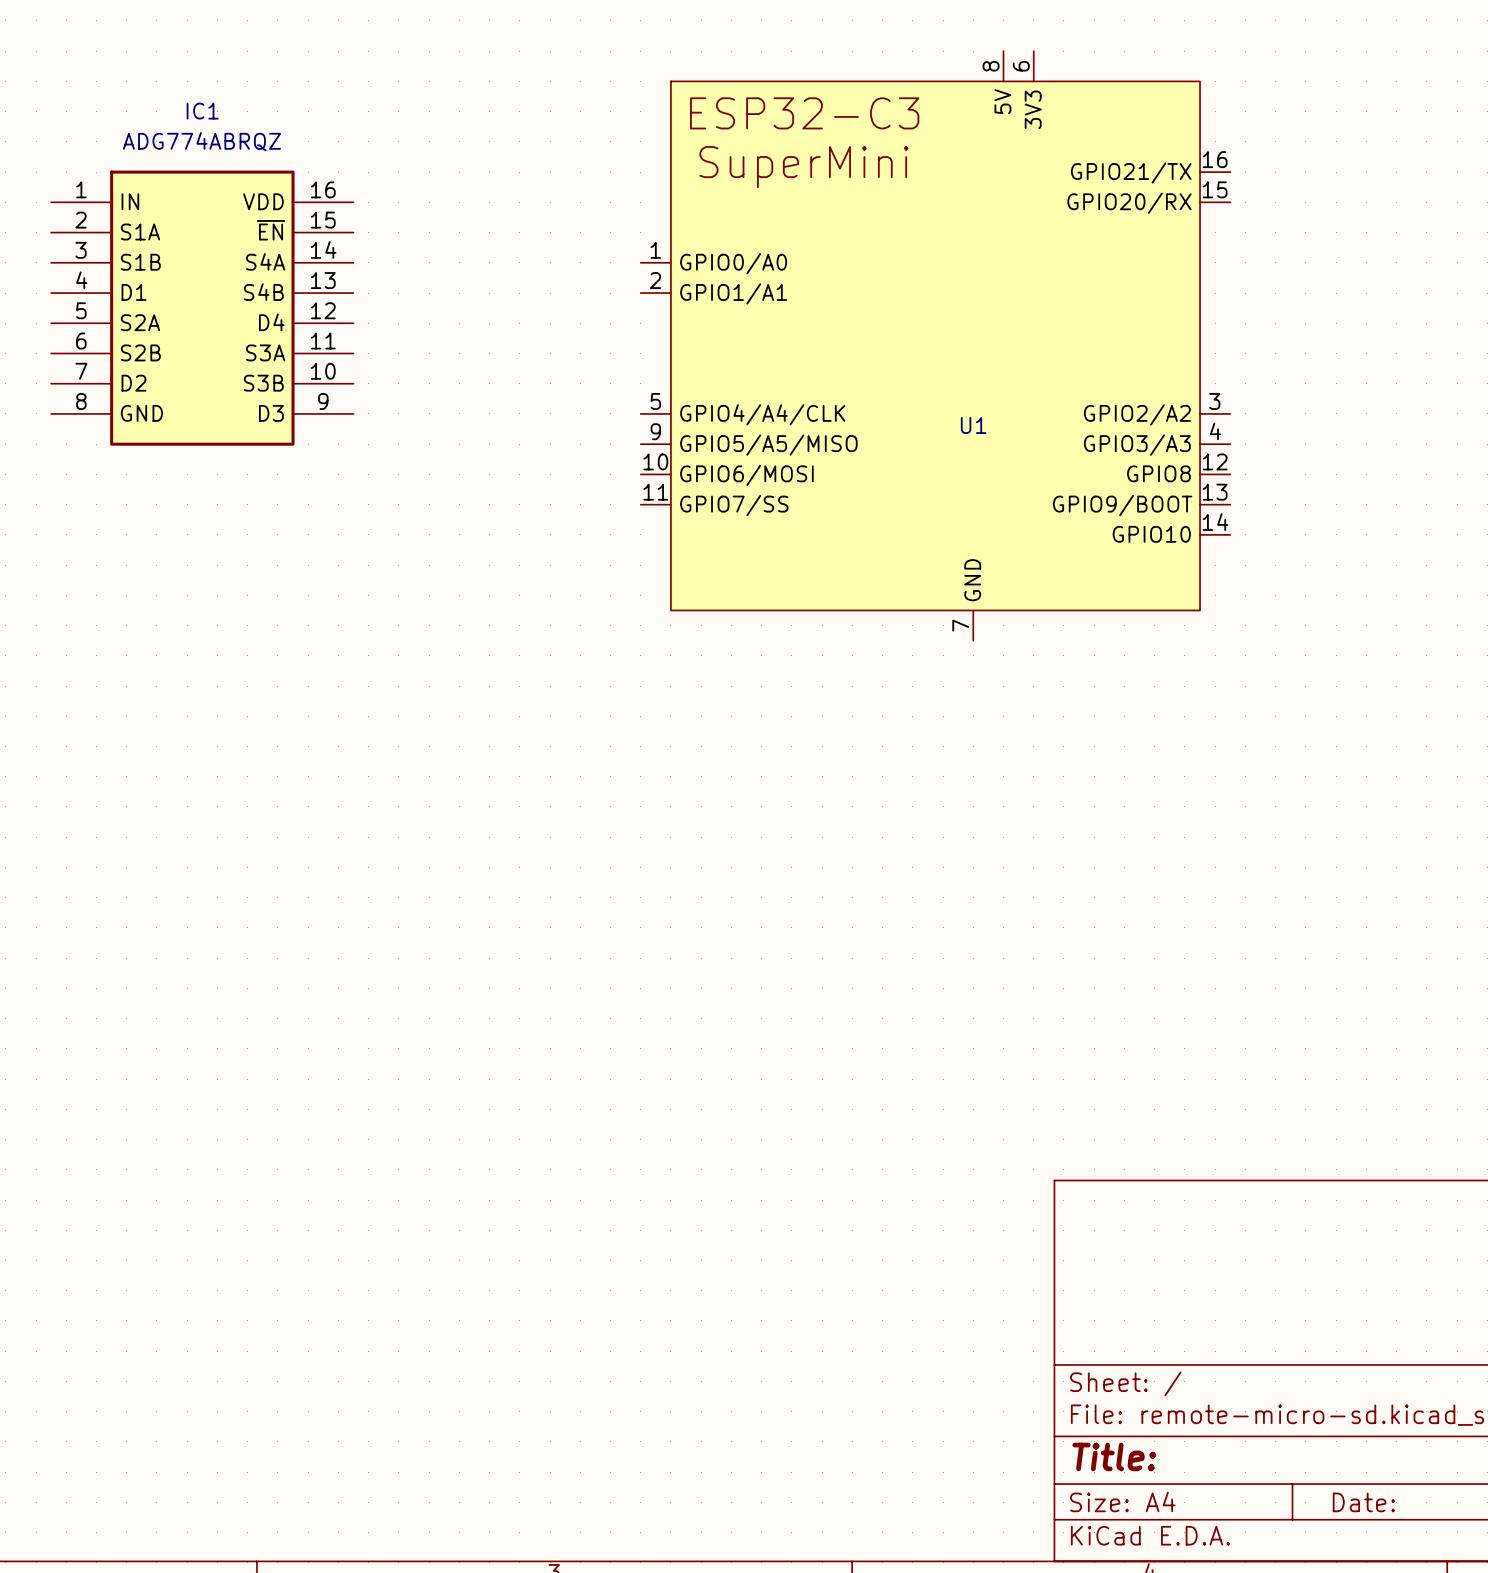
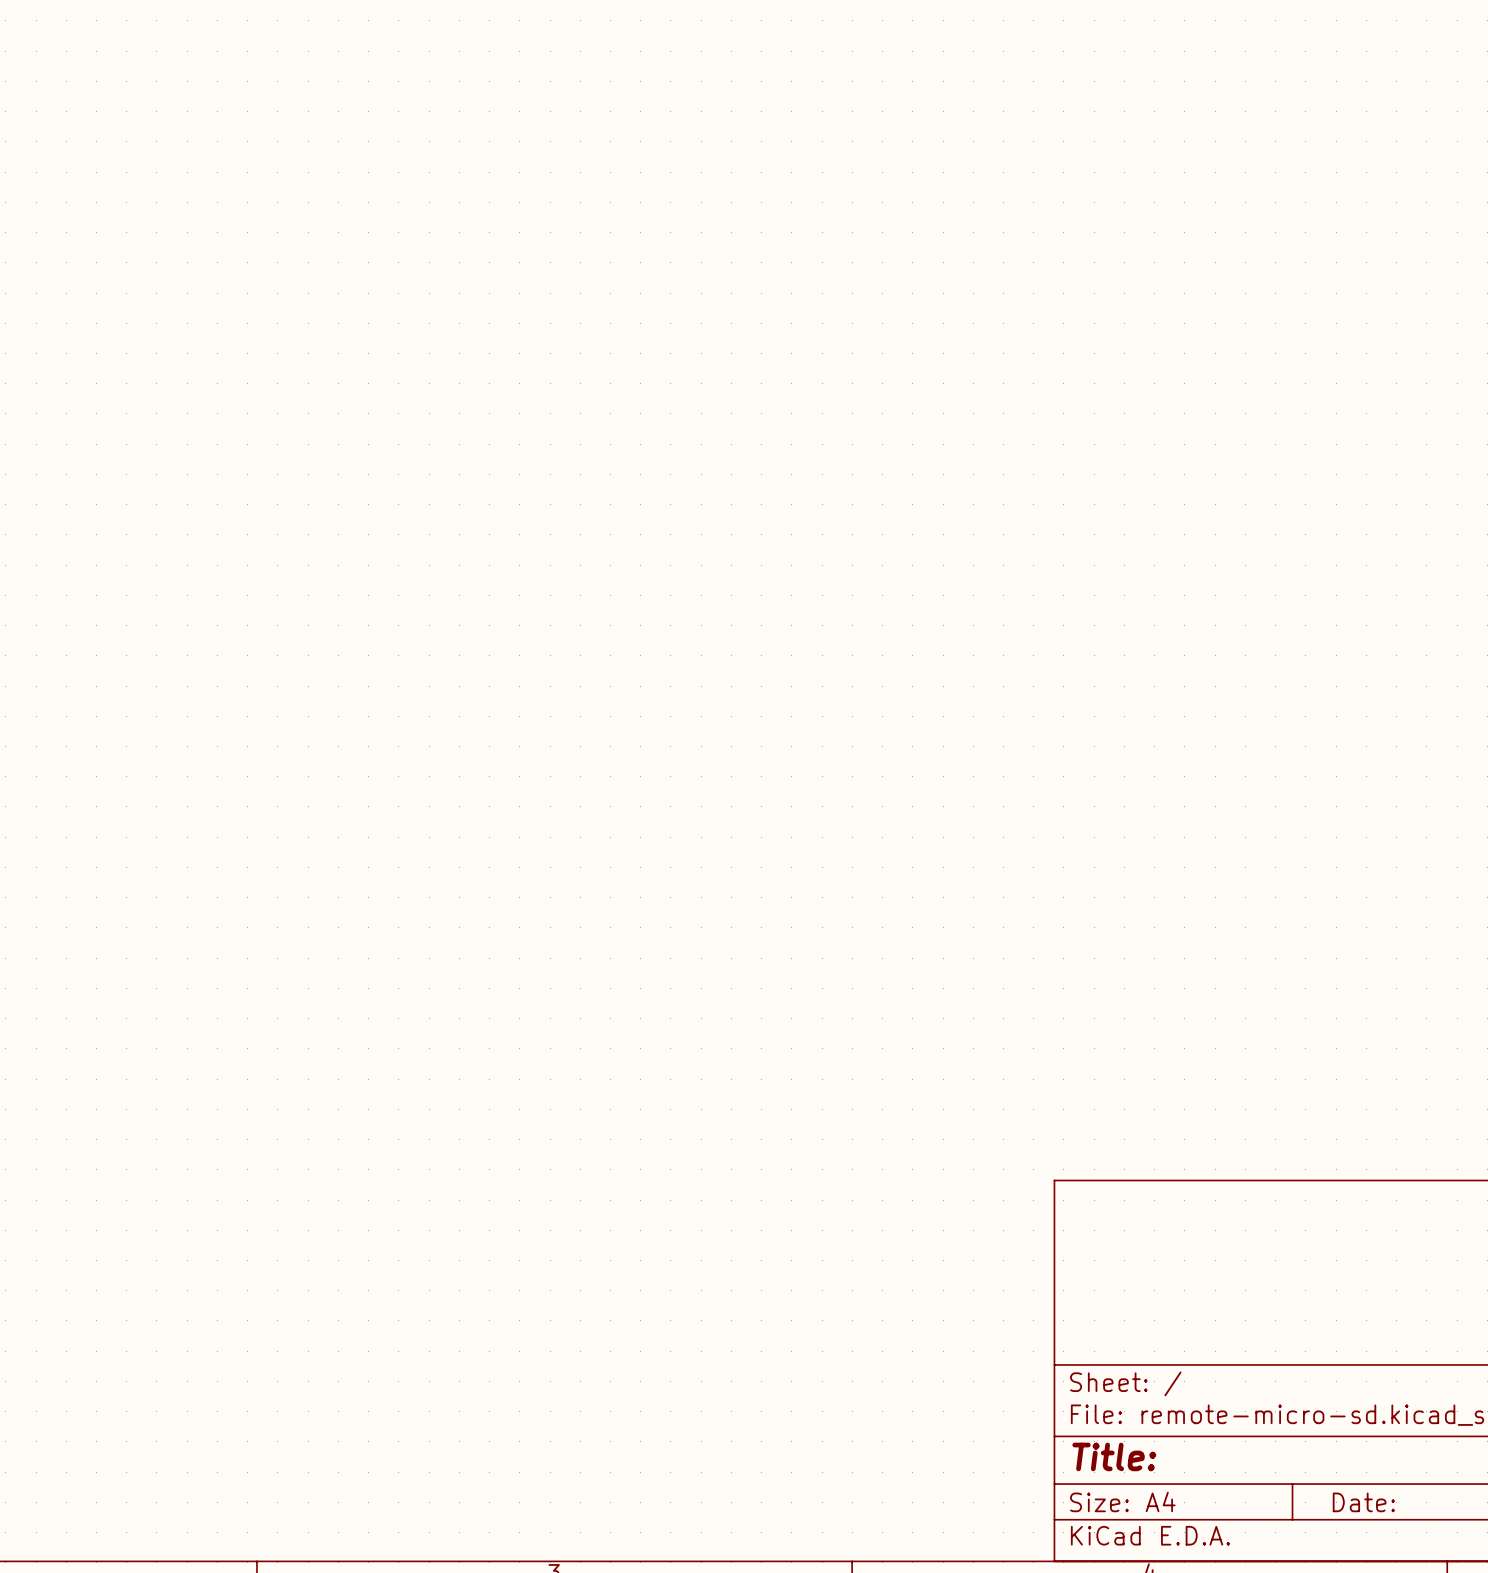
IC1: ADG774ABRQZ (202, 308) -> none
U1: (935, 345) -> none

